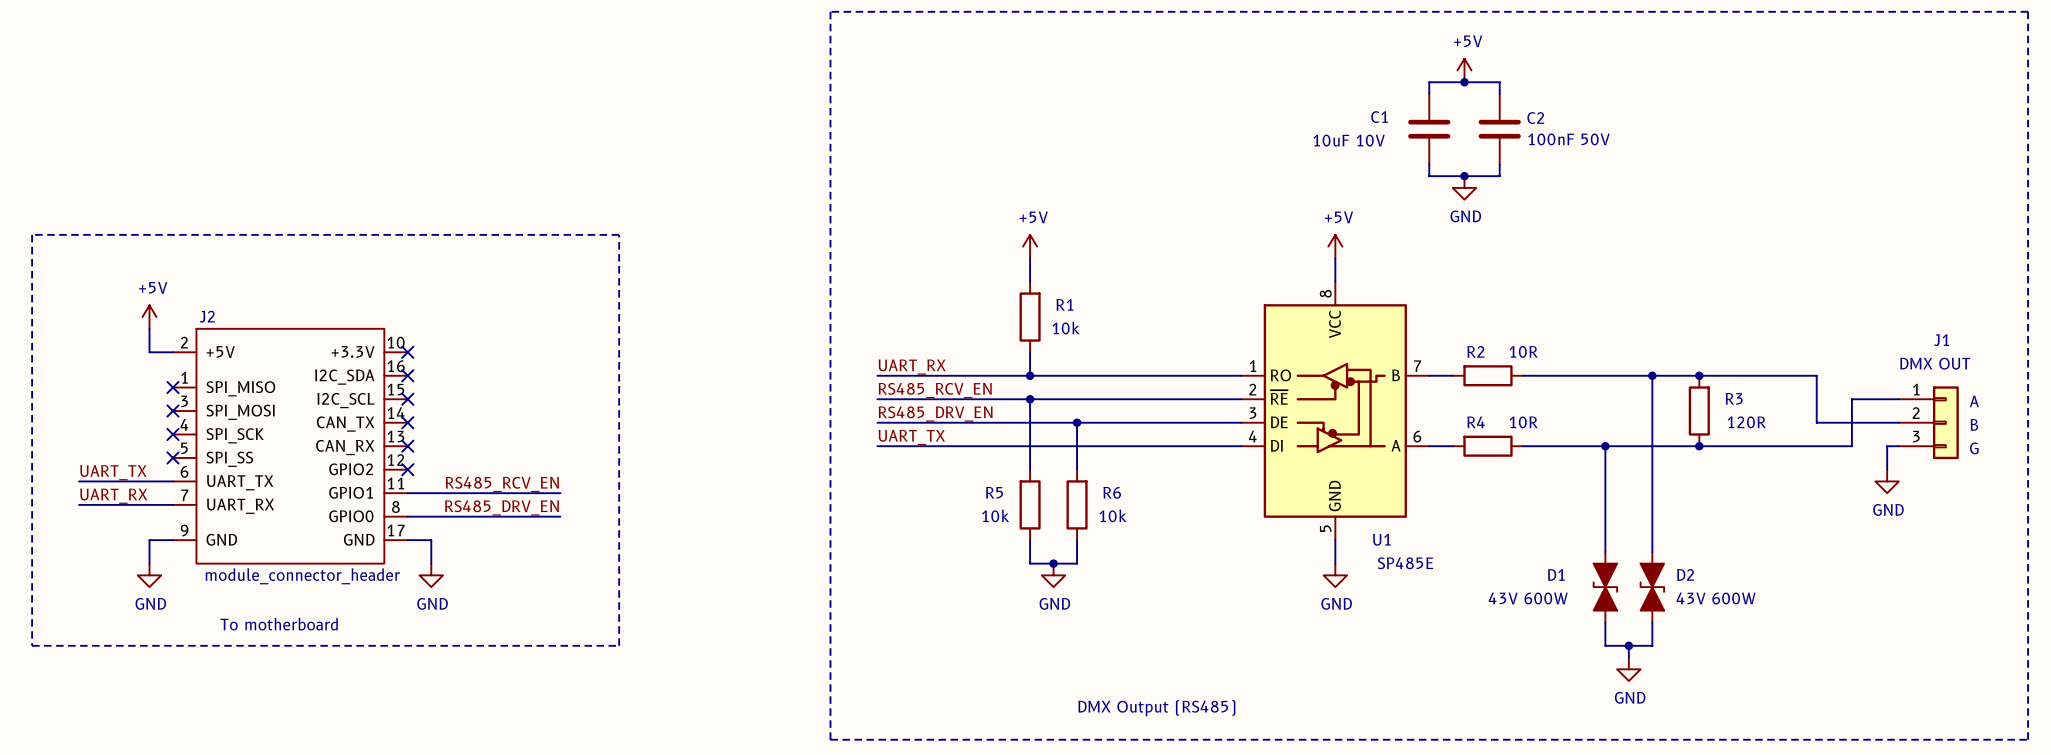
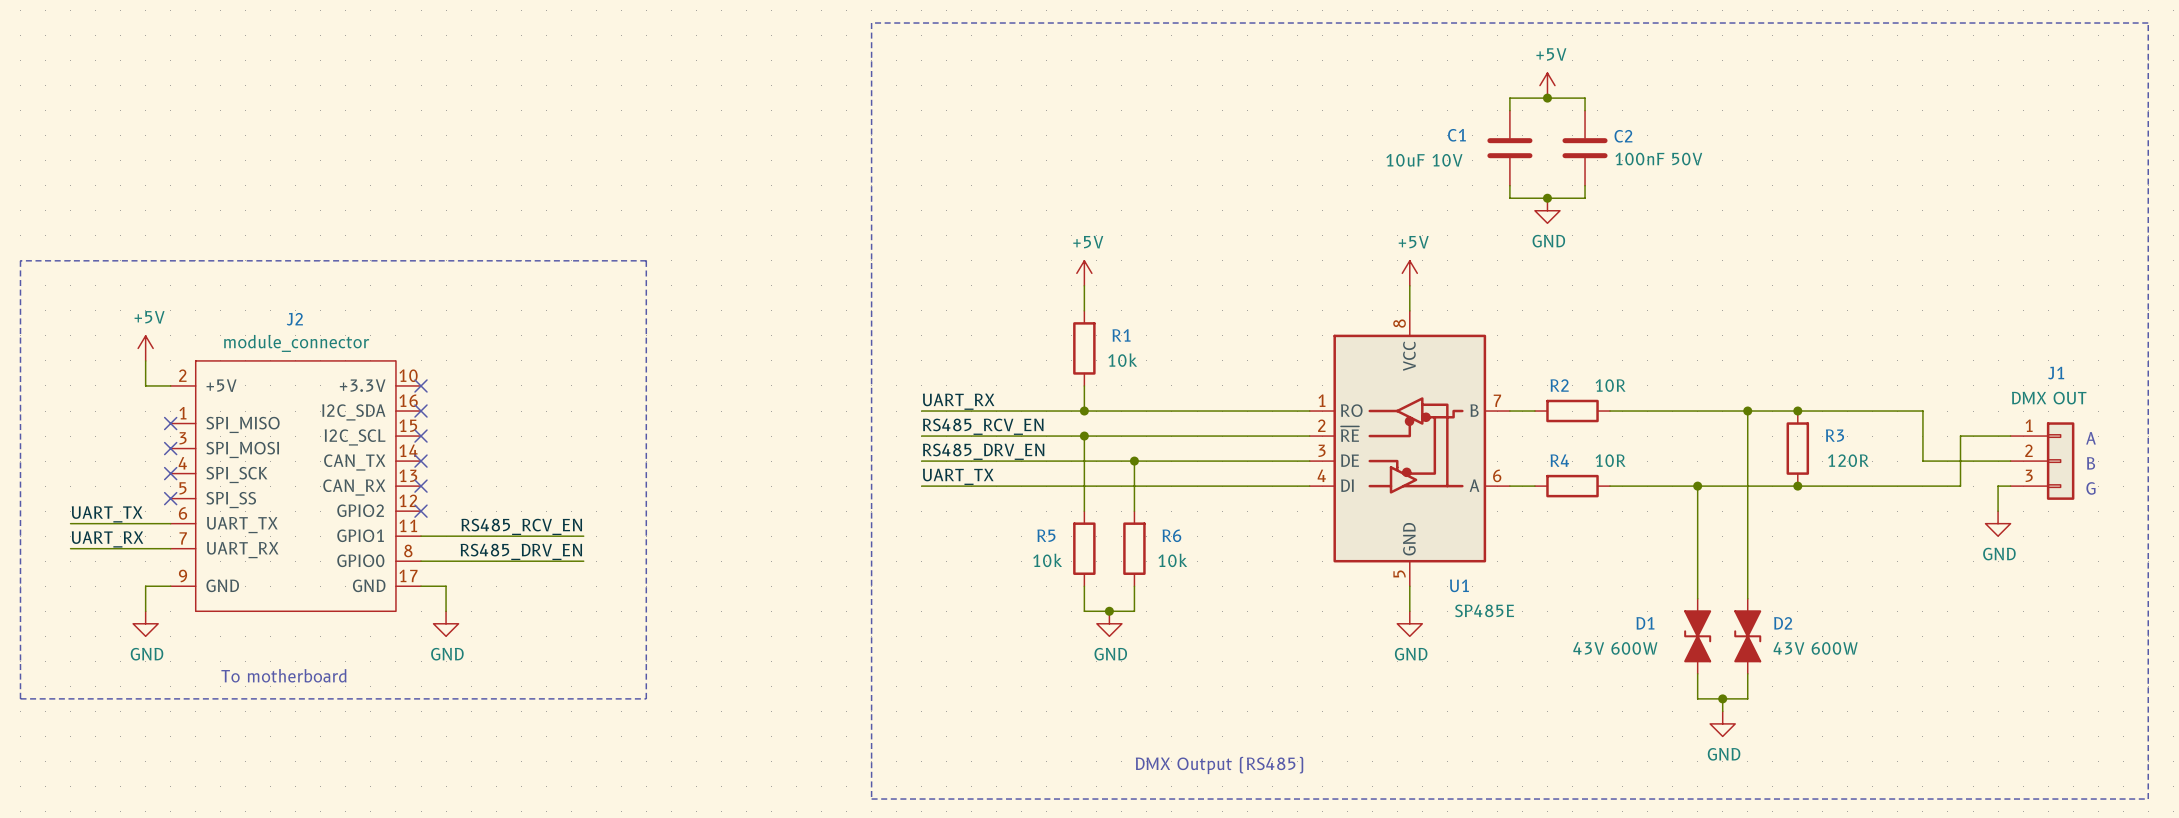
J2 name position: J2 (207, 316) -> J2 (294, 319)
J2 value: module_connector_header (302, 576) -> module_connector (296, 343)

